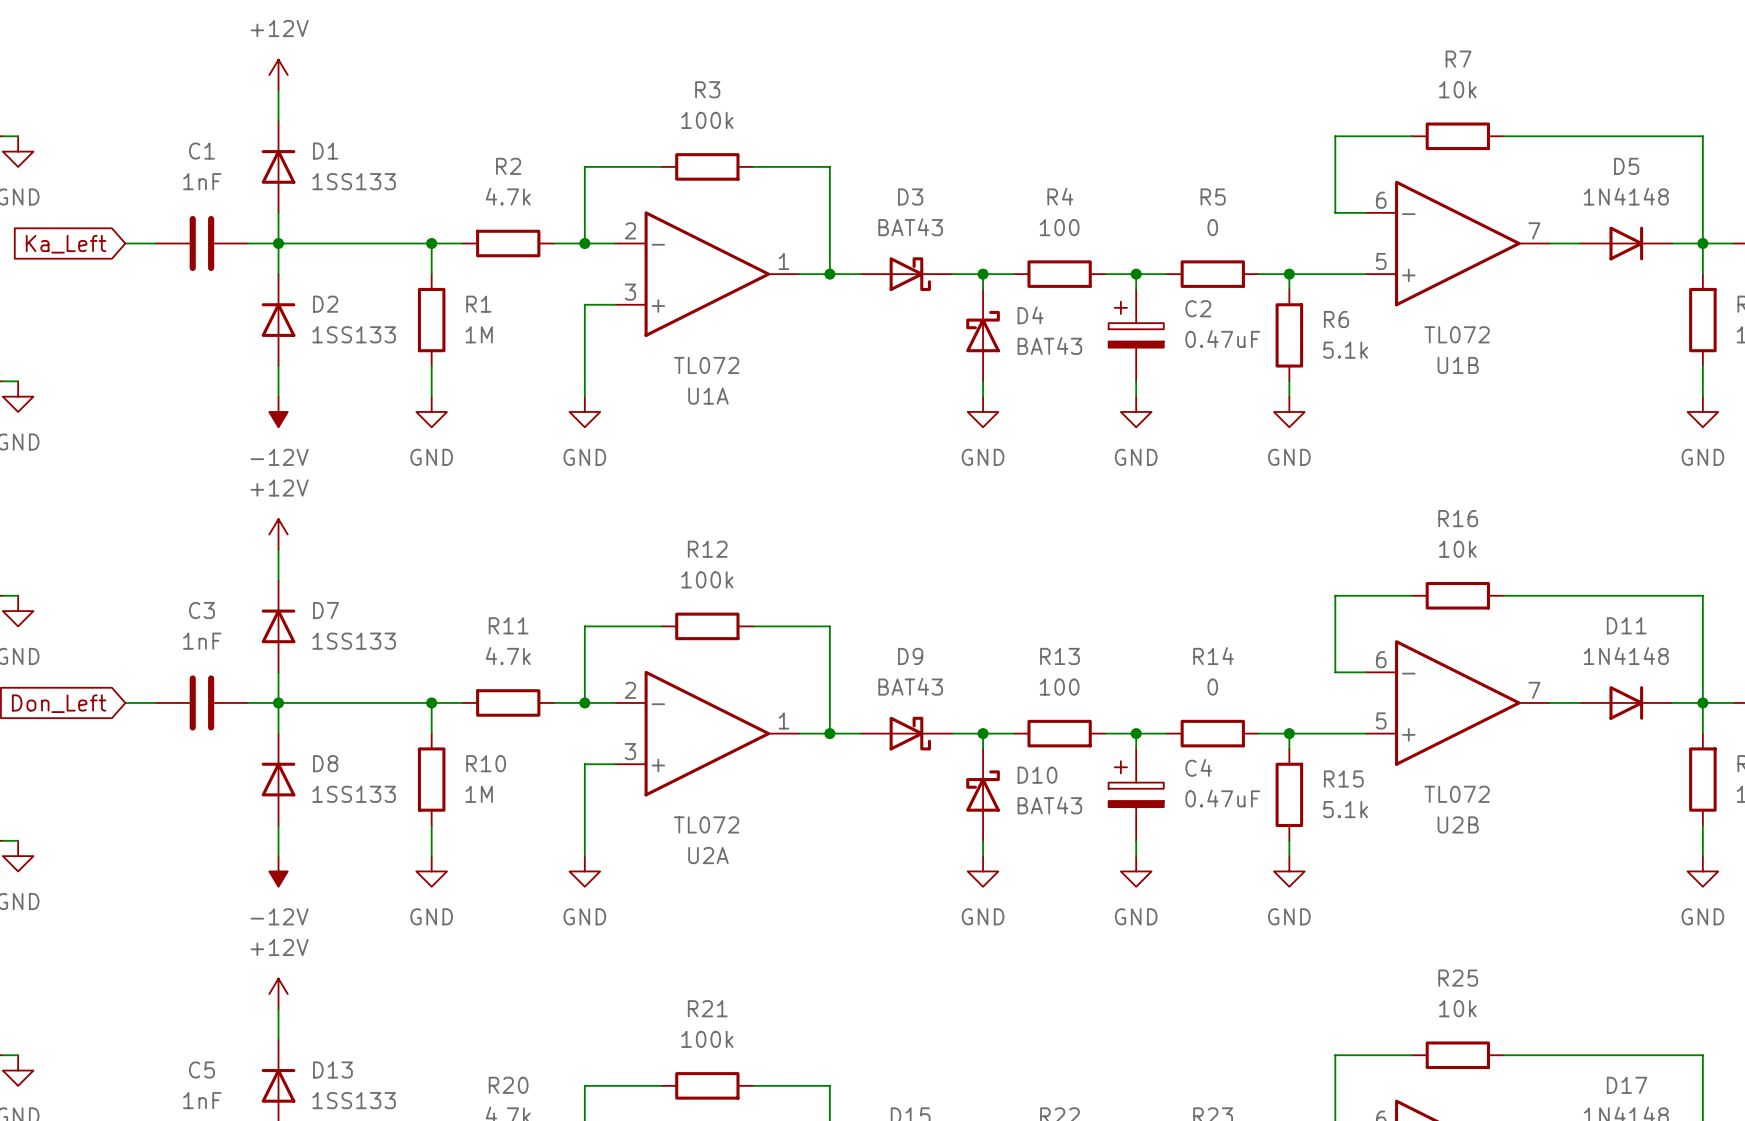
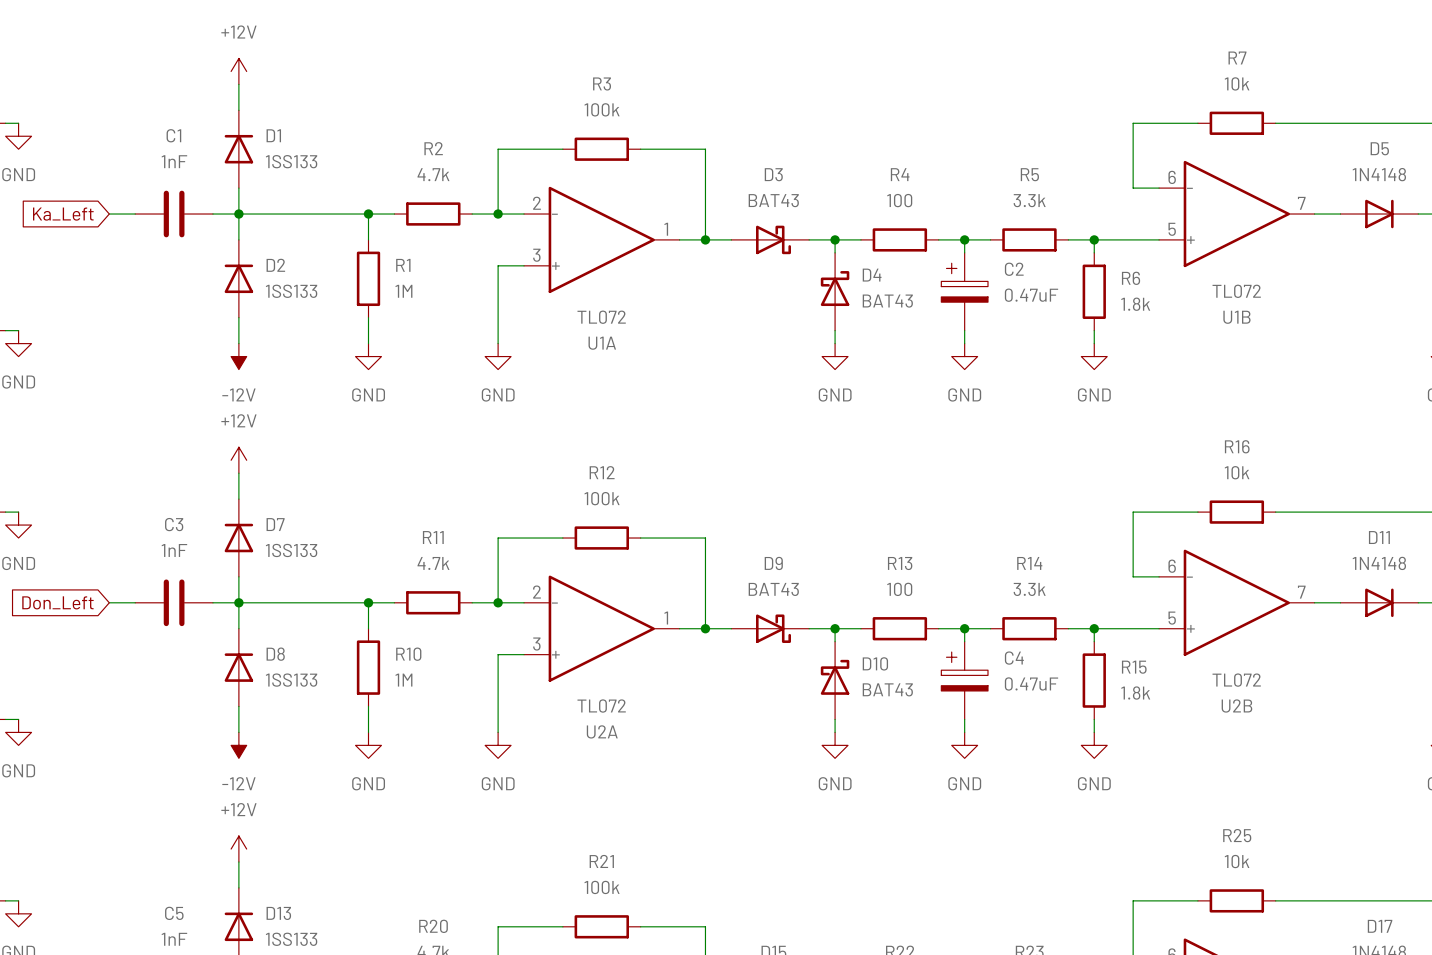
R5 value: 0 (1212, 227) -> 3.3k (1029, 200)
R6 value: 5.1k (1345, 350) -> 1.8k (1135, 304)
R14 value: 0 (1212, 687) -> 3.3k (1029, 589)
R15 value: 5.1k (1345, 809) -> 1.8k (1135, 693)

